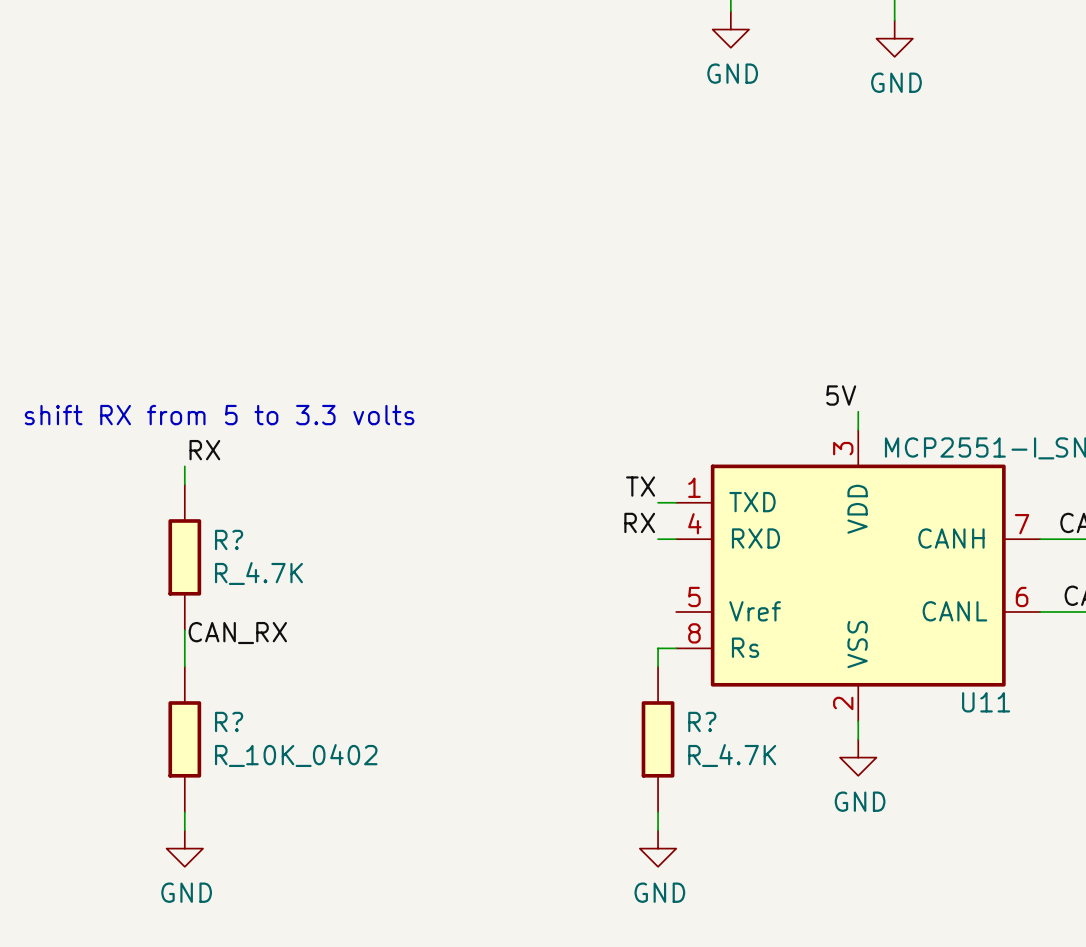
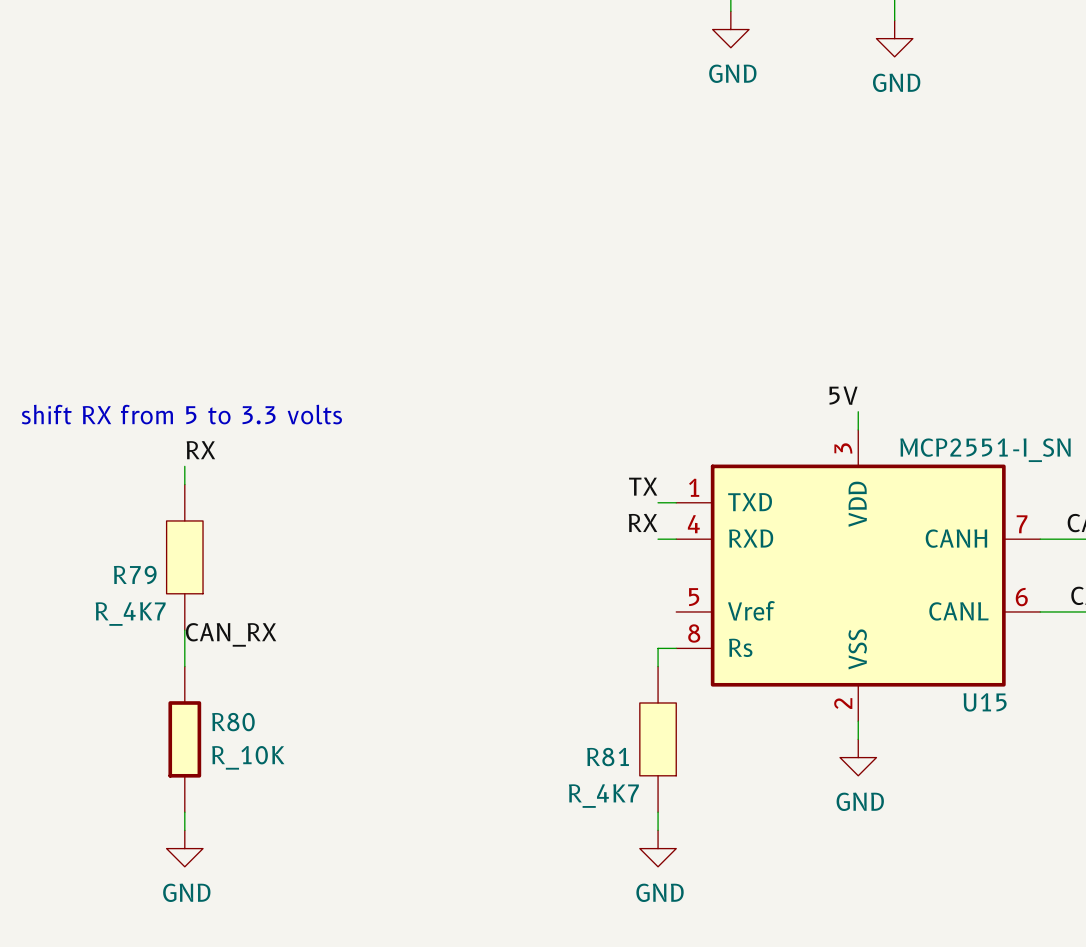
R?: R_4.7K (184, 557) -> none
R79: none -> R_4K7 (184, 557)
U11 name: U11 (986, 702) -> U15 (985, 702)
R? name: R? (229, 721) -> R80 (233, 722)
R?: R_4.7K (658, 739) -> none
R81: none -> R_4K7 (658, 739)
R? value: R_10K_0402 (296, 755) -> R_10K (248, 757)

